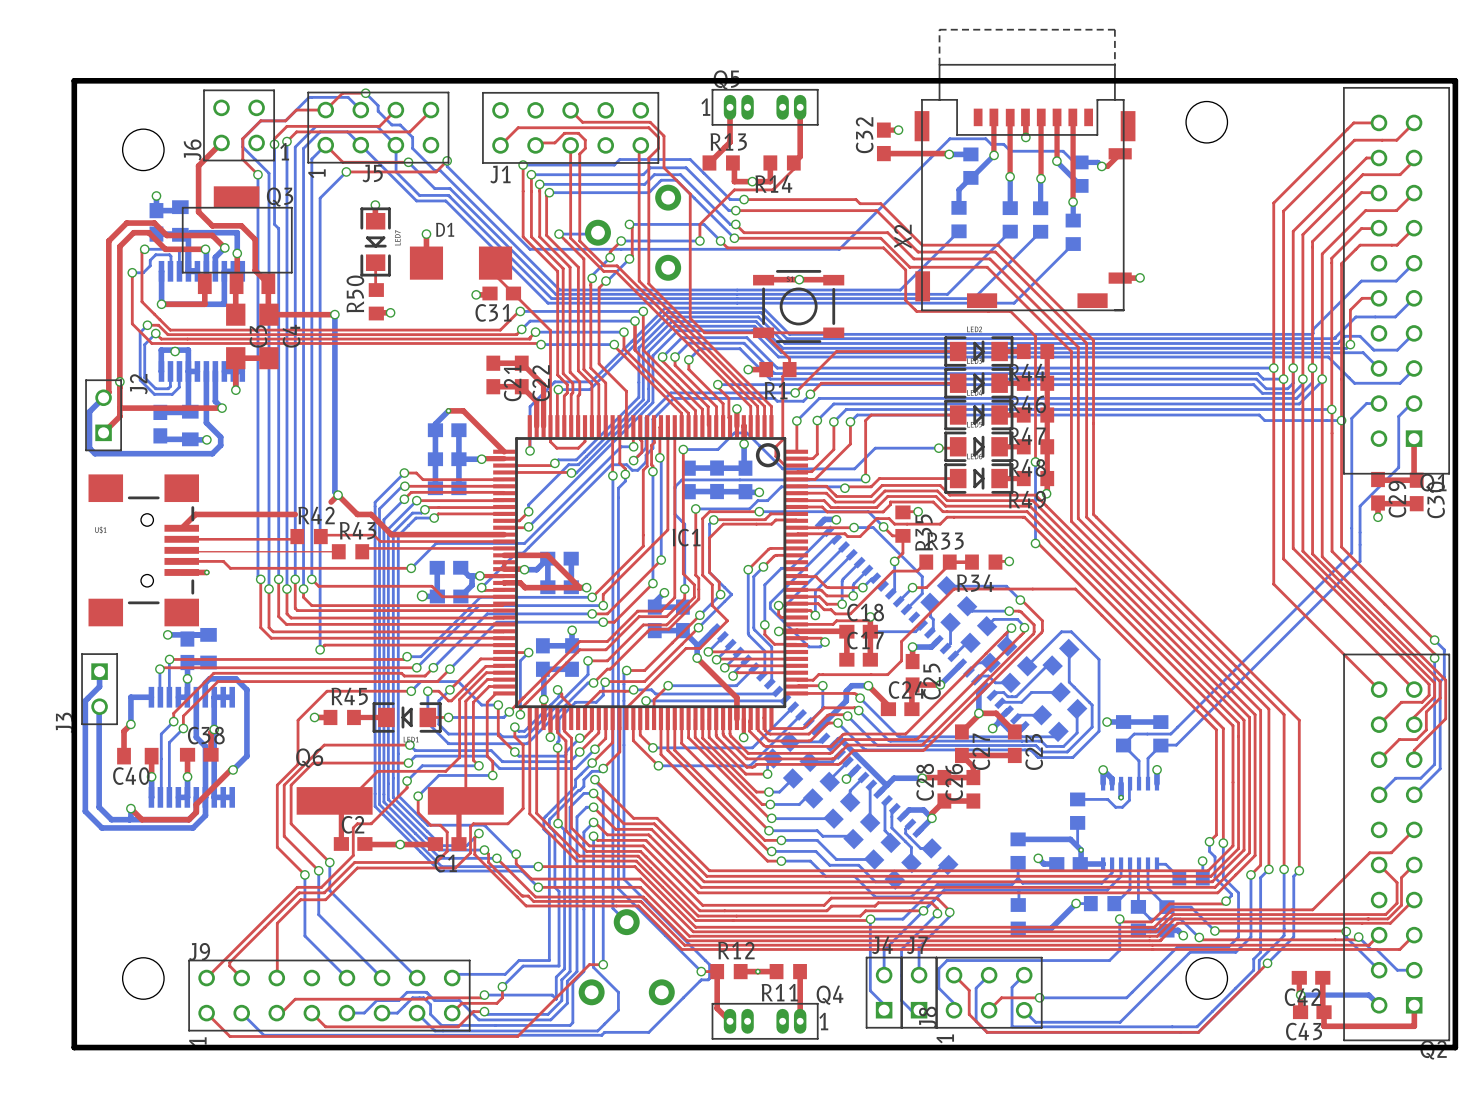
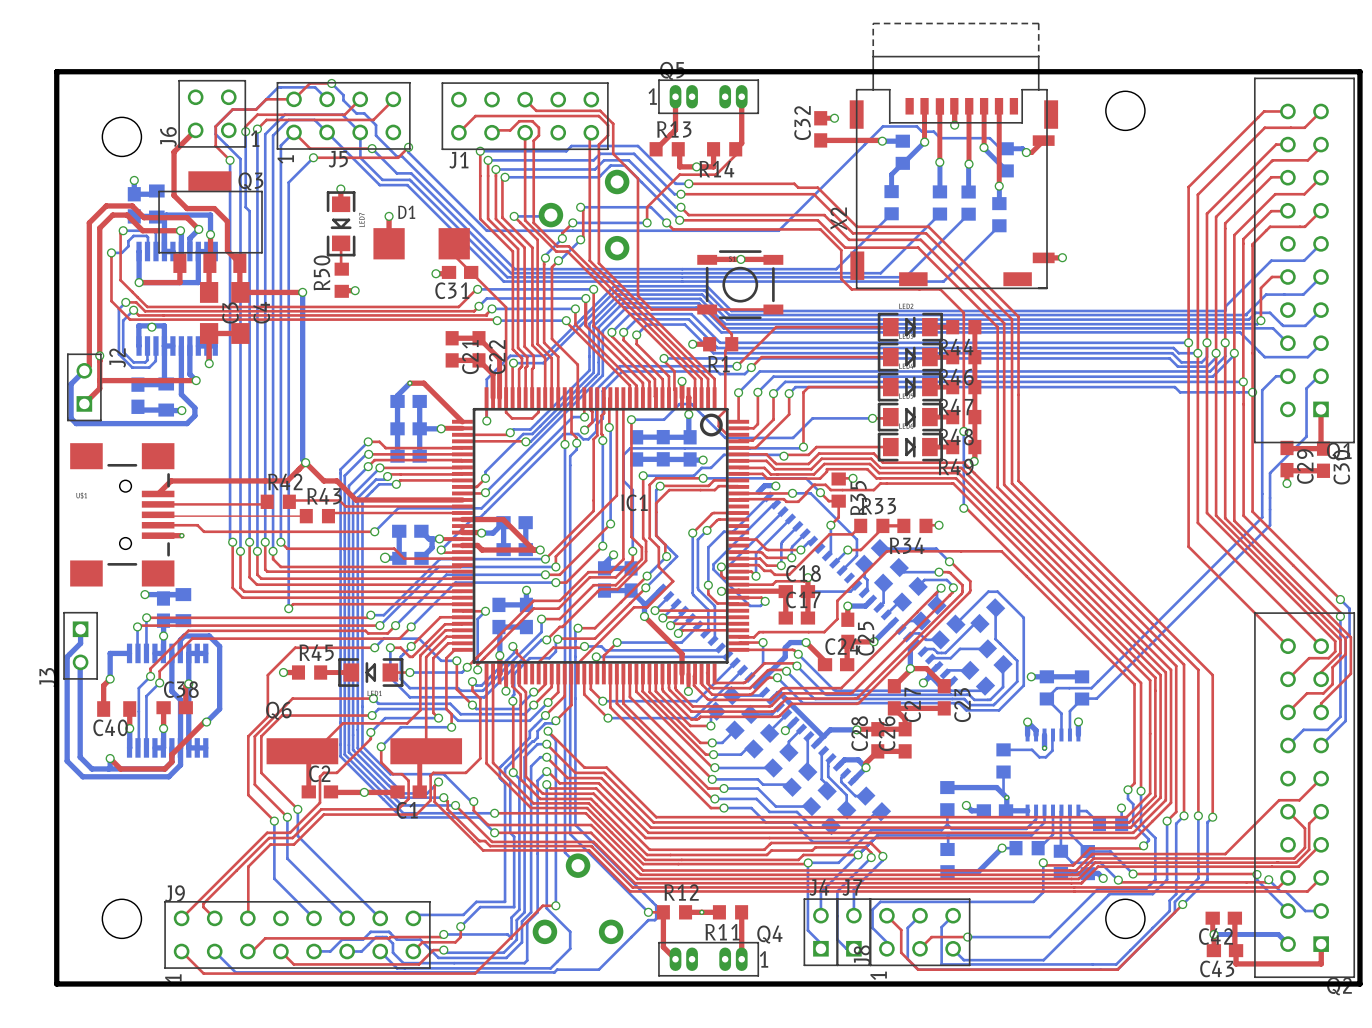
top track: none -> (299, 469) (287, 480) (265, 480)

